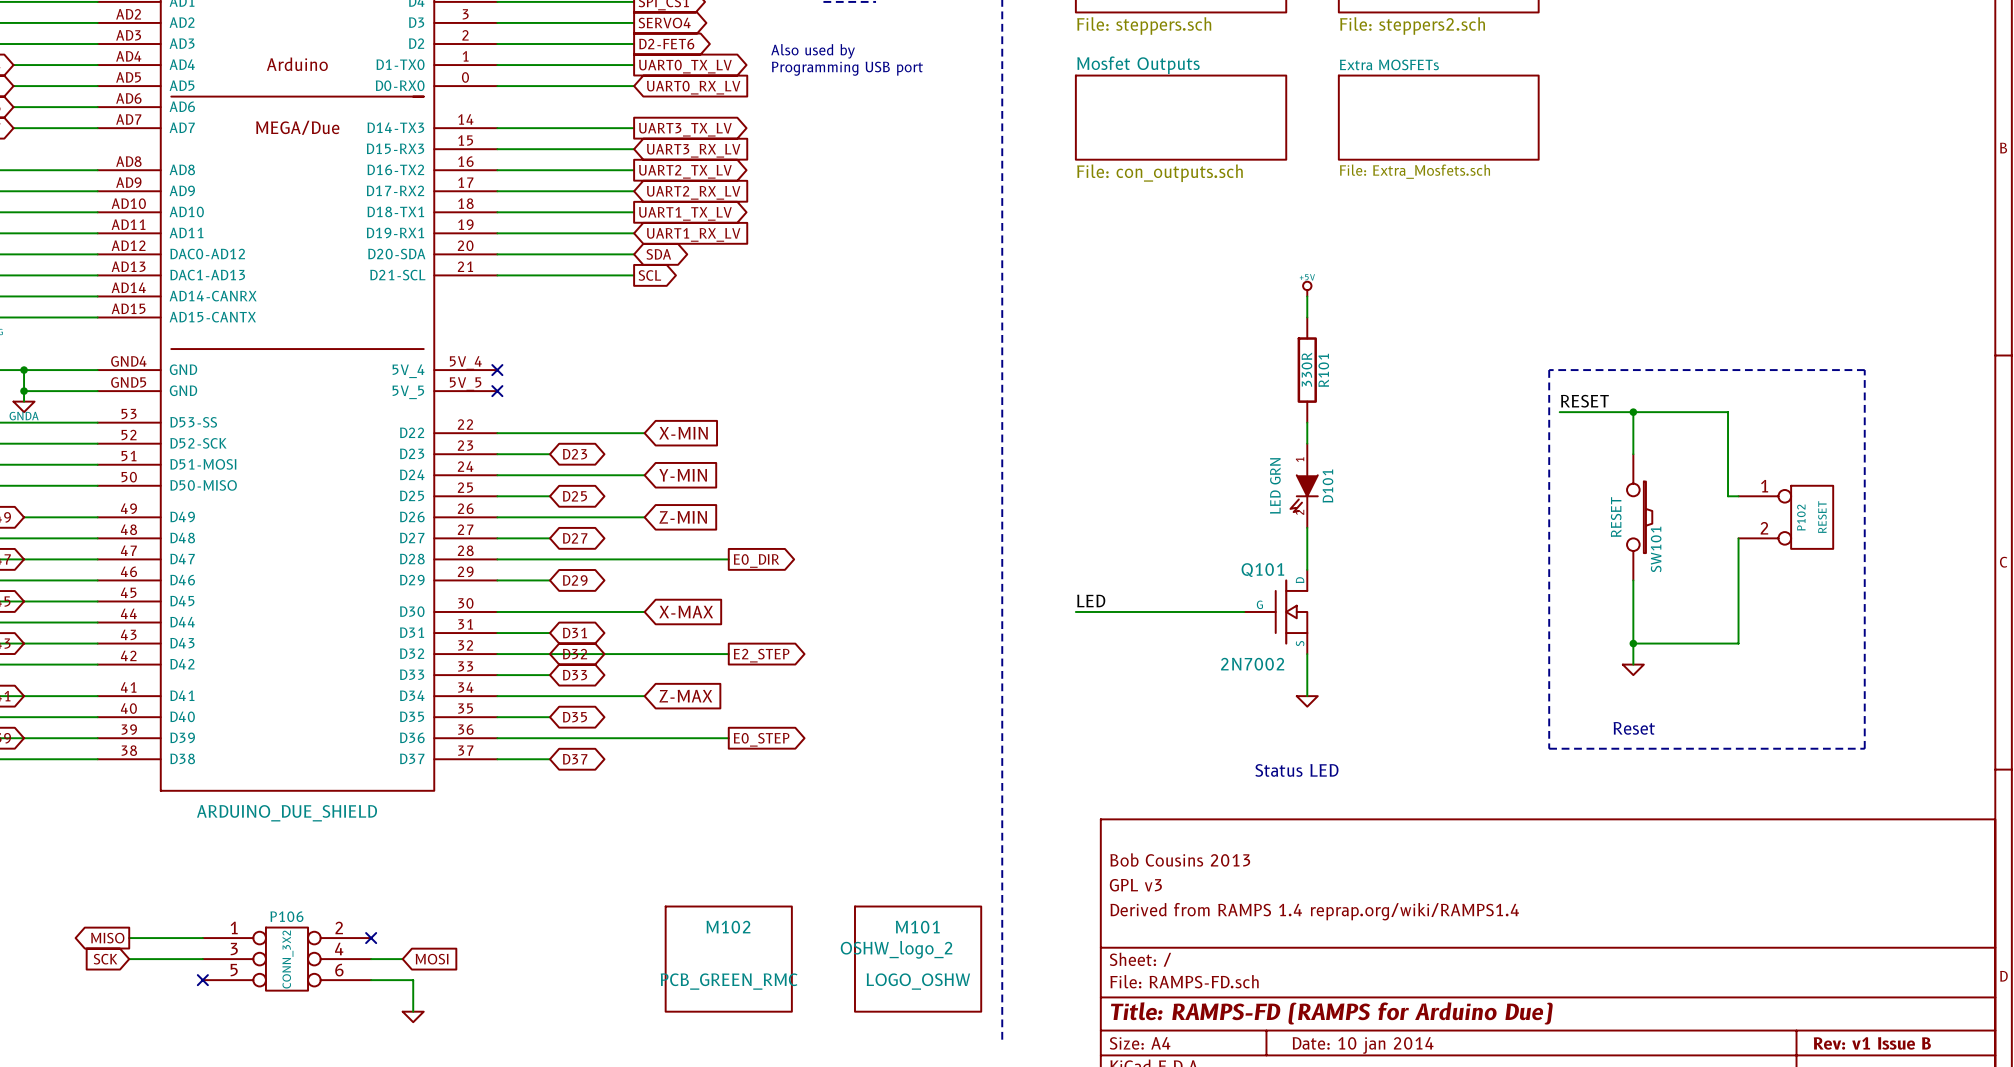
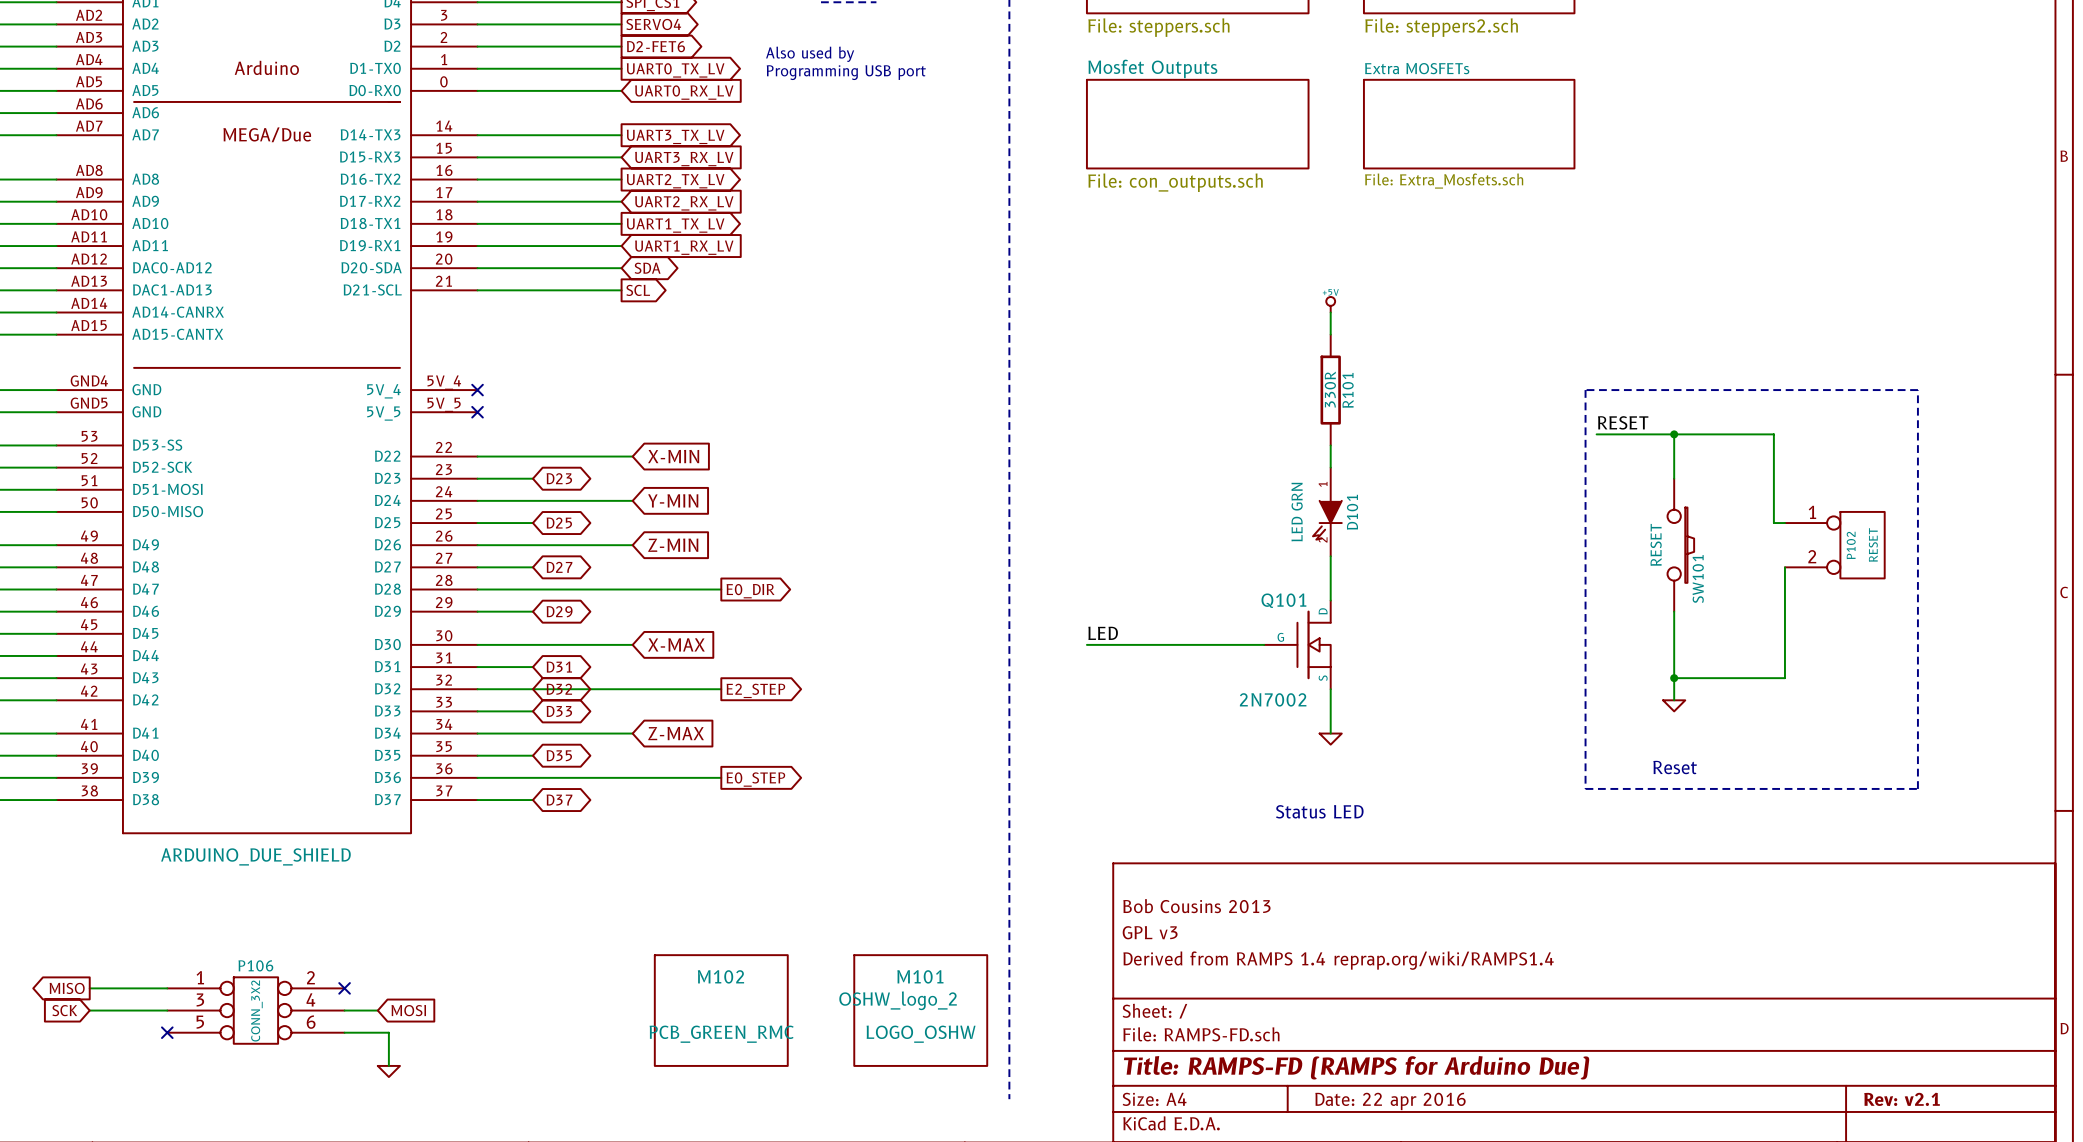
title block: Rev: v1 Issue B (1872, 1043) -> Rev: v2.1 (1902, 1099)
title block: Date: 10 jan 2014 (1363, 1045) -> Date: 22 apr 2016 (1390, 1101)

